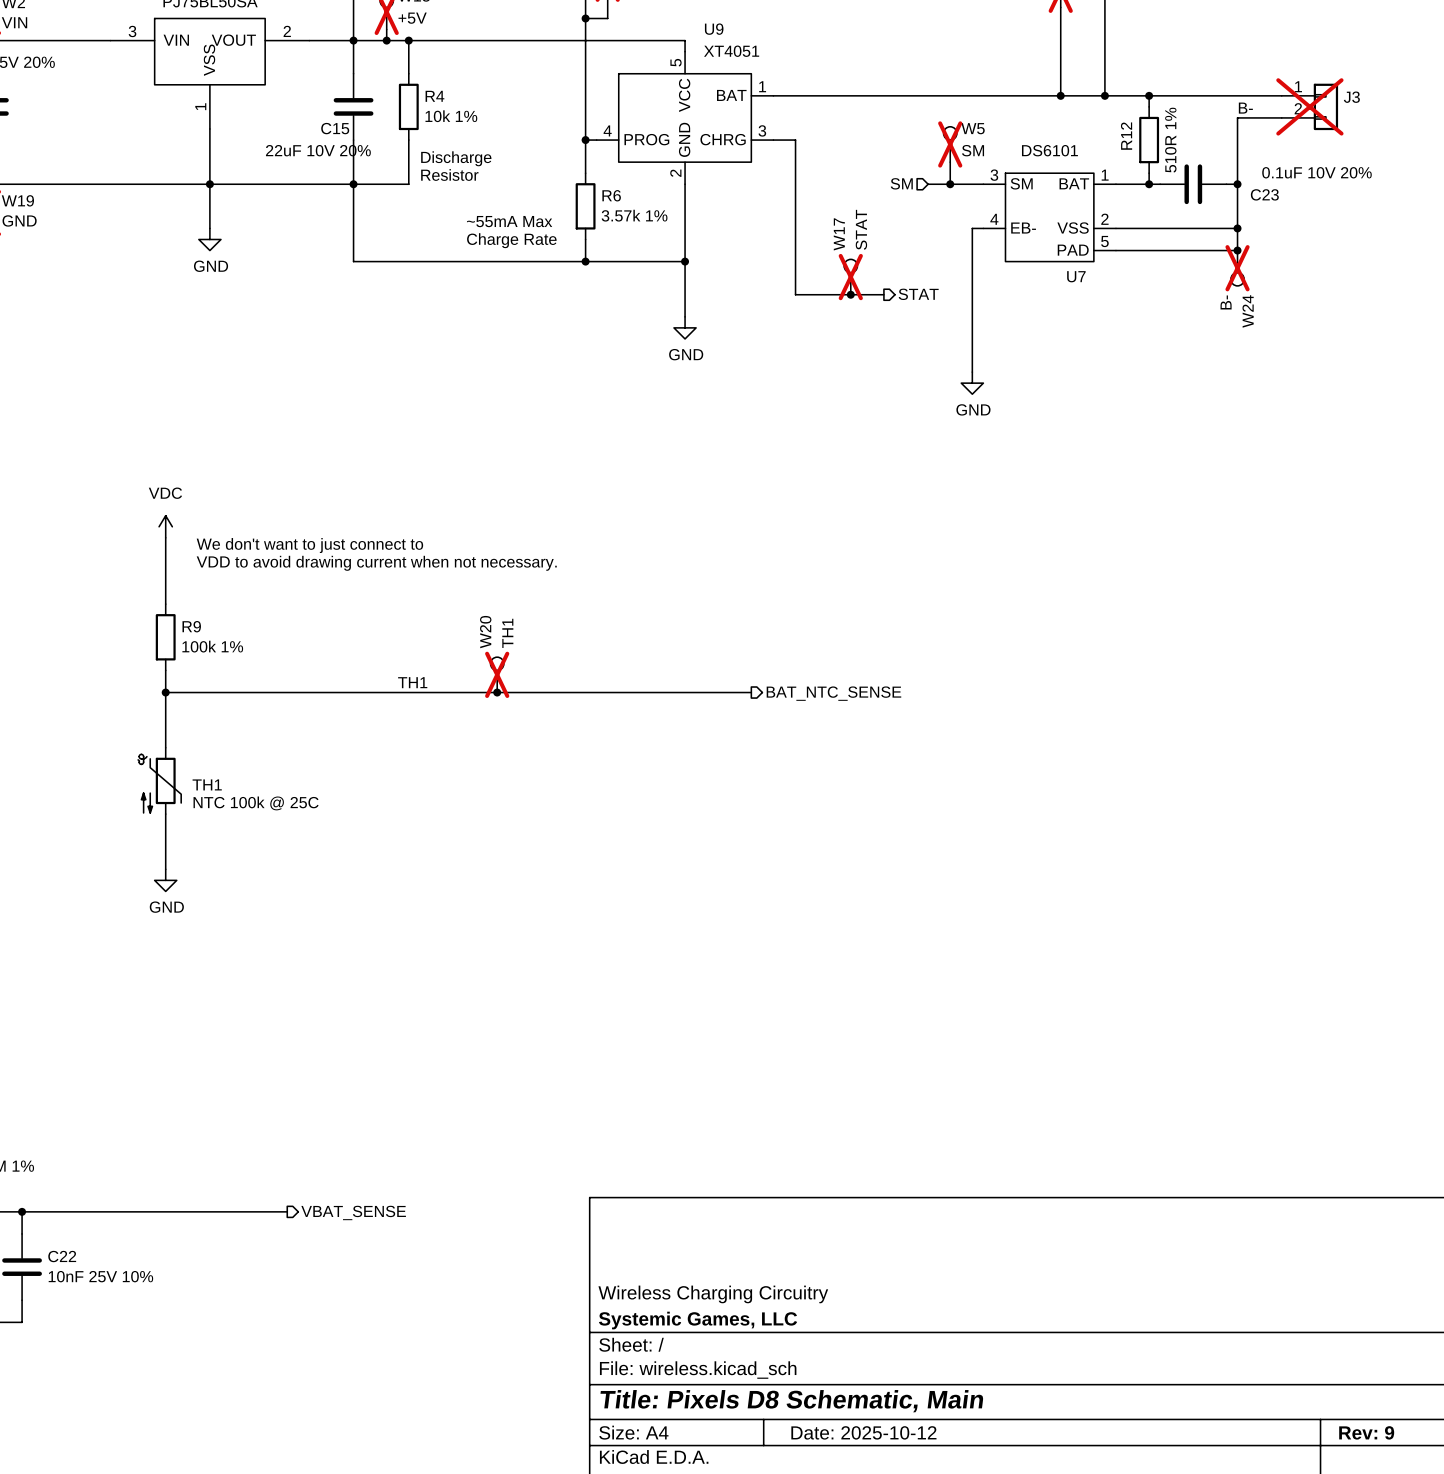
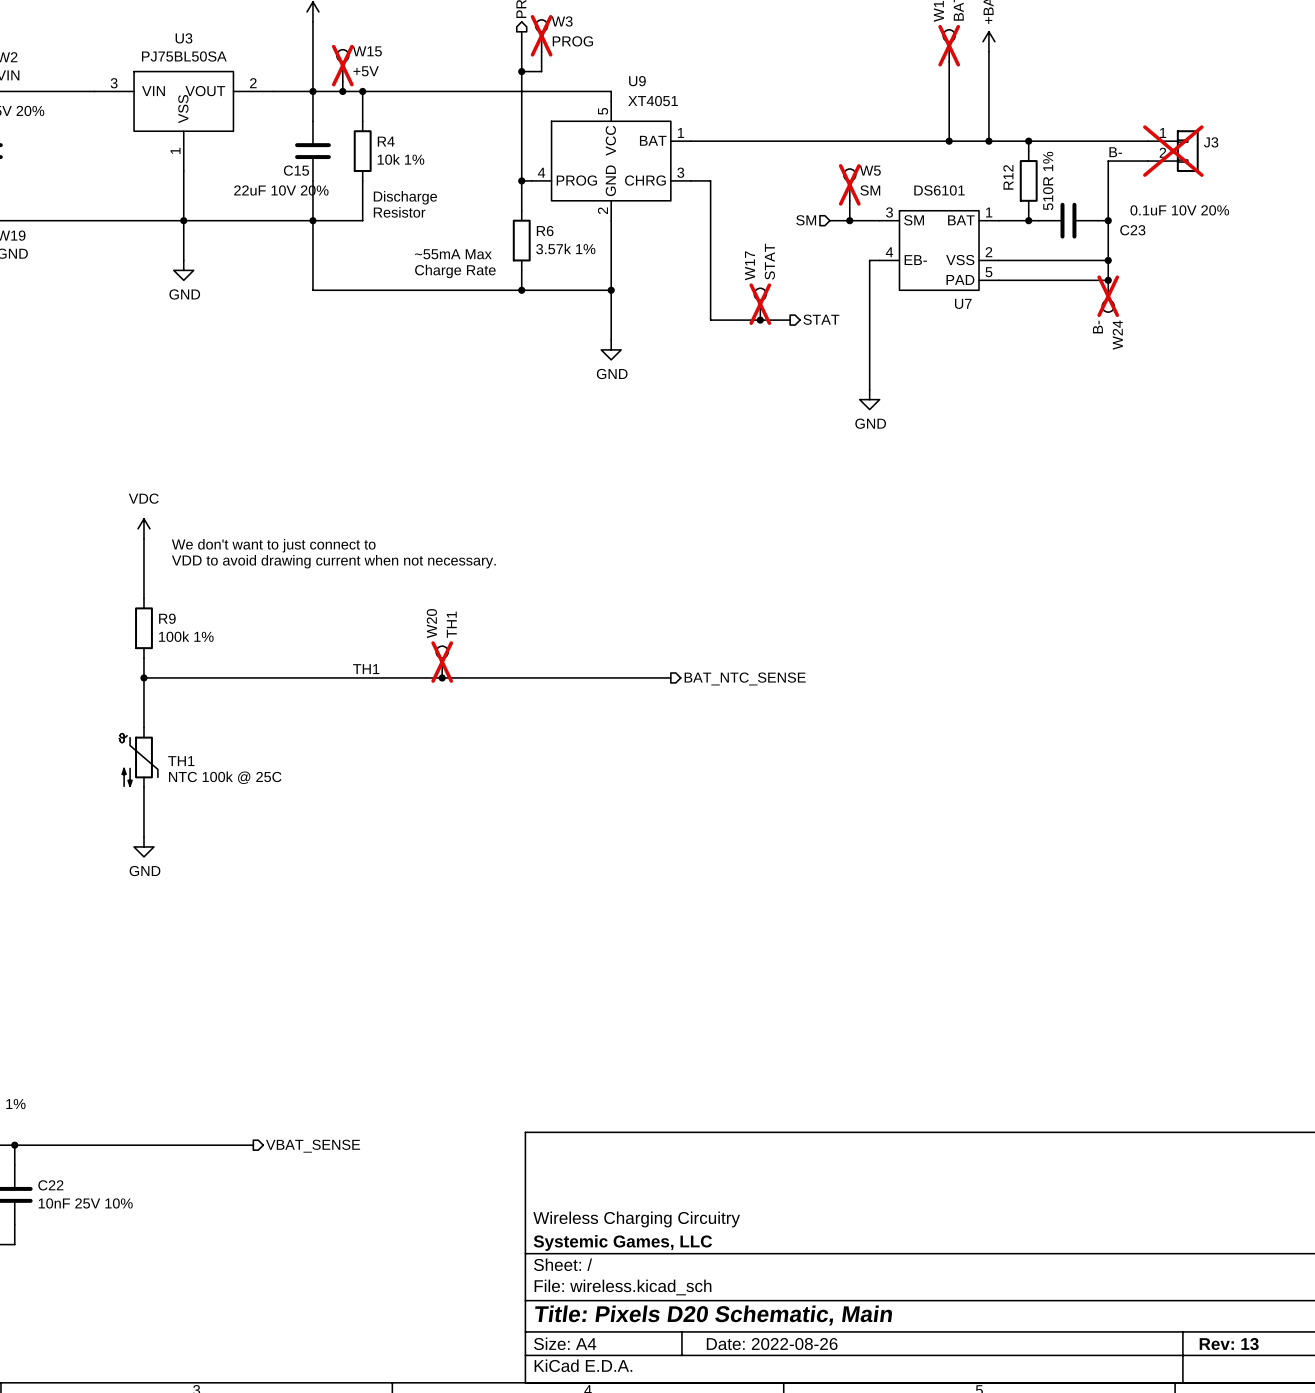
title block: Title: Pixels D8 Schematic, Main (791, 1401) -> Title: Pixels D20 Schematic, Main (713, 1315)
title block: Date: 2025-10-12 (863, 1432) -> Date: 2022-08-26 (772, 1344)
title block: Rev: 9 (1366, 1432) -> Rev: 13 (1229, 1344)

